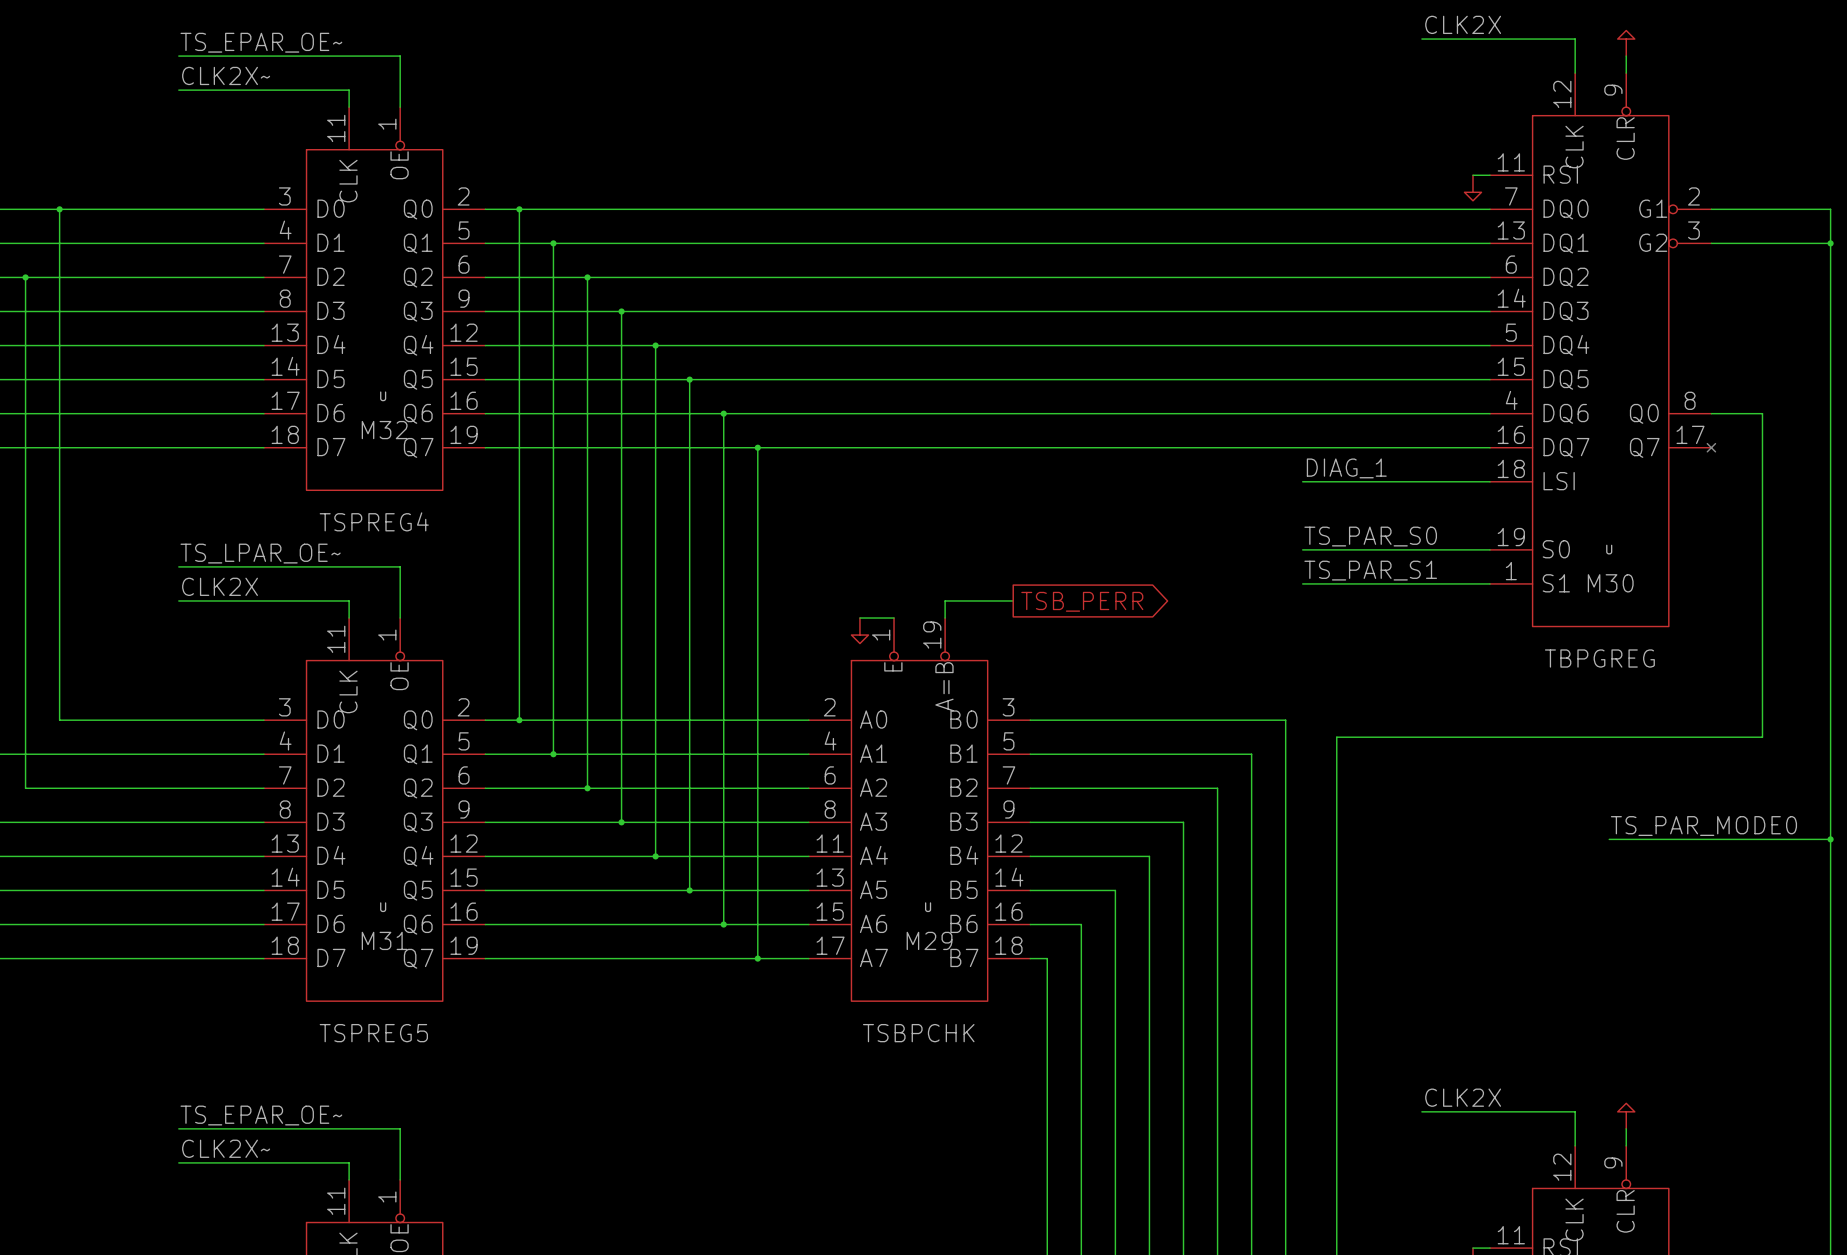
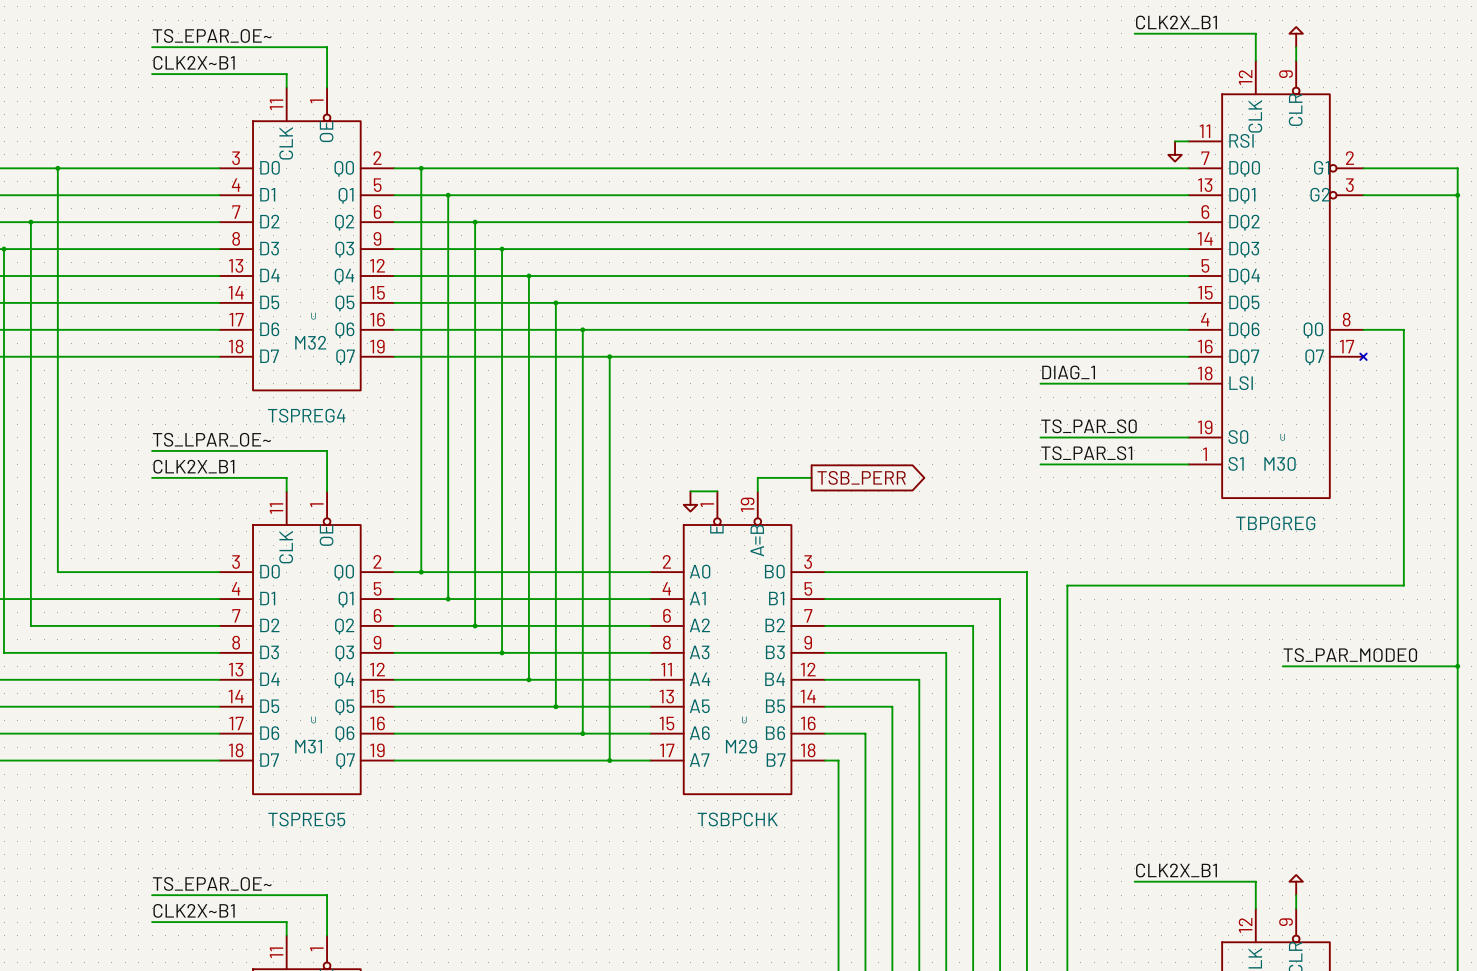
label: CLK2X (1463, 24) -> CLK2X_B1 (1176, 22)
label: CLK2X~ (226, 75) -> CLK2X~B1 (194, 62)
label: CLK2X (220, 586) -> CLK2X_B1 (193, 466)
label: CLK2X (1463, 1097) -> CLK2X_B1 (1176, 870)
label: CLK2X~ (226, 1148) -> CLK2X~B1 (194, 910)

